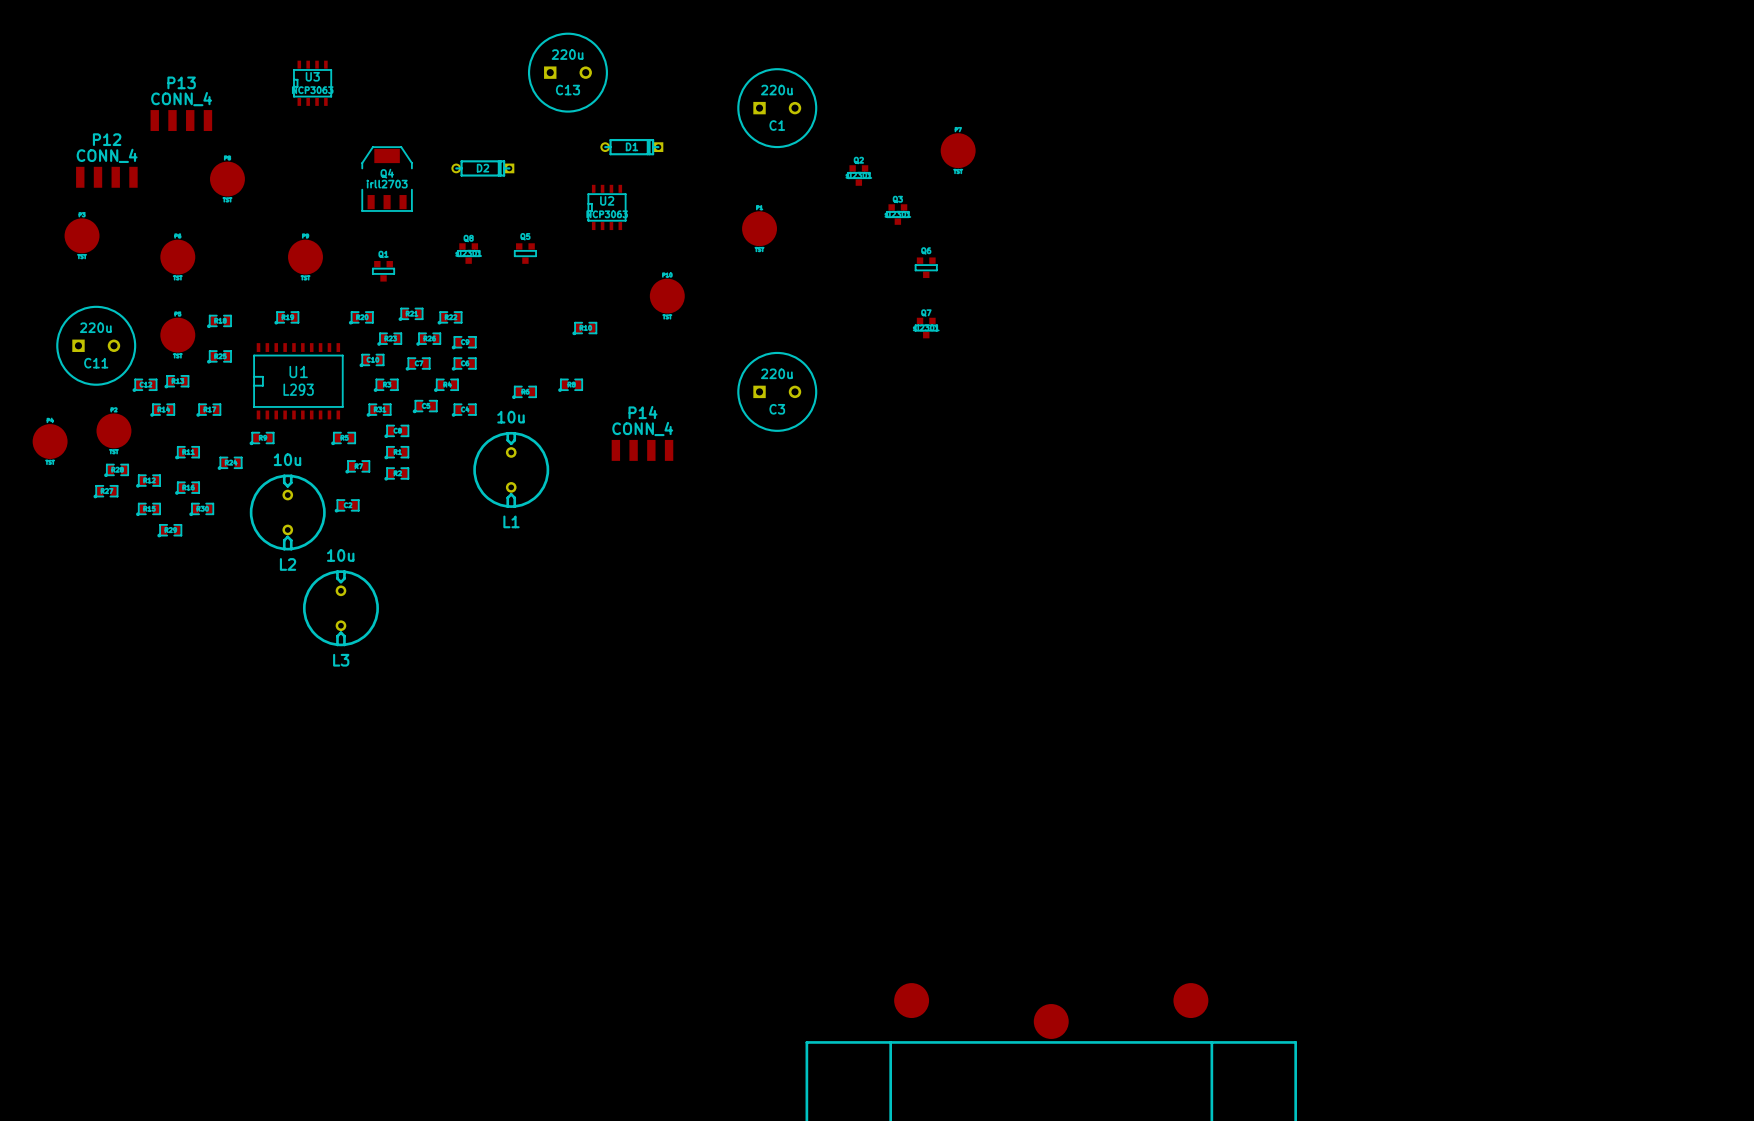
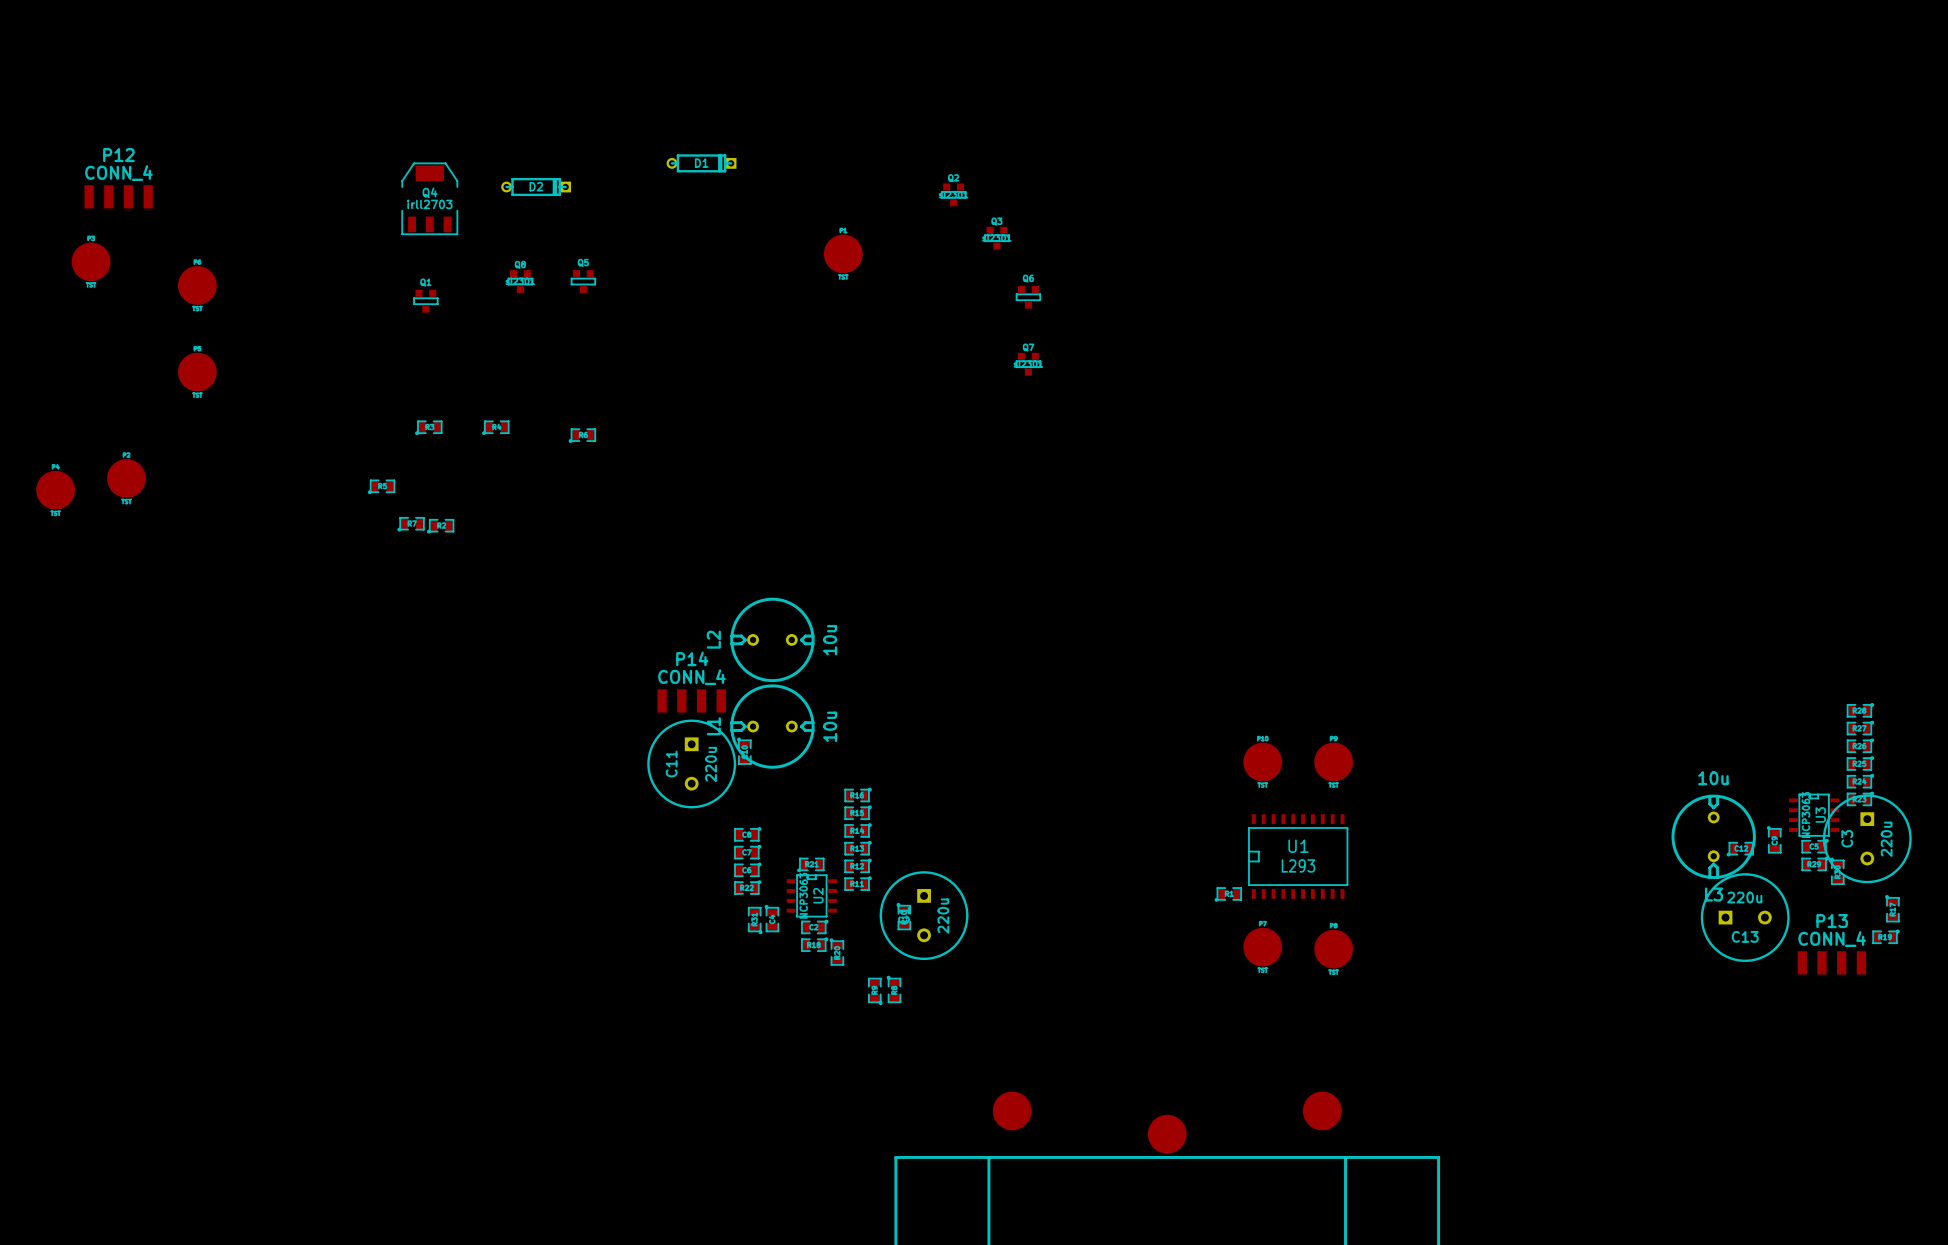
C13 position: (567, 72) -> (1745, 917)
U3 rotation: 0° (312, 83) -> 90° clockwise (1814, 815)
U3 position: (312, 83) -> (1814, 815)
C1 rotation: 0° (777, 108) -> 90° clockwise (924, 915)
C1 position: (777, 108) -> (924, 915)
P13 position: (181, 120) -> (1831, 962)
part position: (958, 150) -> (1262, 947)
part position: (227, 179) -> (1333, 949)
U2 rotation: 0° (607, 207) -> 90° clockwise (811, 895)
U2 position: (607, 207) -> (811, 895)
part position: (305, 257) -> (1333, 762)
part position: (667, 296) -> (1262, 762)
part position: (411, 314) -> (810, 864)
part rotation: 0° (286, 317) -> 180° (1886, 936)
part position: (286, 317) -> (1886, 936)
part rotation: 0° (361, 317) -> 90° clockwise (836, 952)
part position: (361, 317) -> (836, 952)
part rotation: 0° (450, 317) -> 180° (747, 887)
part position: (450, 317) -> (747, 887)
part rotation: 0° (219, 321) -> 180° (814, 944)
part position: (219, 321) -> (814, 944)
part rotation: 0° (584, 328) -> 90° clockwise (903, 916)
part position: (584, 328) -> (903, 916)
part rotation: 0° (389, 339) -> 180° (1860, 798)
part position: (389, 339) -> (1860, 798)
part rotation: 0° (428, 339) -> 180° (1860, 745)
part position: (428, 339) -> (1860, 745)
part rotation: 0° (464, 342) -> 90° clockwise (1774, 839)
part position: (464, 342) -> (1774, 839)
C11 rotation: 0° (96, 345) -> 90° clockwise (691, 763)
C11 position: (96, 345) -> (691, 763)
part rotation: 0° (219, 356) -> 180° (1860, 763)
part position: (219, 356) -> (1860, 763)
part rotation: 0° (372, 360) -> 90° clockwise (744, 751)
part position: (372, 360) -> (744, 751)
part rotation: 0° (418, 363) -> 180° (747, 852)
part position: (418, 363) -> (747, 852)
part rotation: 0° (464, 363) -> 180° (747, 869)
part position: (464, 363) -> (747, 869)
part rotation: 0° (176, 381) -> 180° (858, 848)
part position: (176, 381) -> (858, 848)
U1 position: (298, 381) -> (1298, 856)
part position: (144, 385) -> (1740, 849)
part rotation: 0° (570, 385) -> 90° clockwise (894, 989)
part position: (570, 385) -> (894, 989)
C3 rotation: 0° (777, 391) -> 90° clockwise (1867, 838)
C3 position: (777, 391) -> (1867, 838)
part rotation: 0° (425, 406) -> 180° (1815, 846)
part position: (425, 406) -> (1815, 846)
part rotation: 0° (162, 410) -> 180° (858, 830)
part position: (162, 410) -> (858, 830)
part rotation: 0° (208, 410) -> 90° clockwise (1892, 908)
part position: (208, 410) -> (1892, 908)
part rotation: 0° (379, 410) -> 90° counterclockwise (755, 920)
part position: (379, 410) -> (755, 920)
part rotation: 0° (464, 410) -> 90° clockwise (771, 918)
part position: (464, 410) -> (771, 918)
part rotation: 0° (396, 431) -> 180° (747, 834)
part position: (396, 431) -> (747, 834)
part rotation: 0° (262, 438) -> 90° counterclockwise (875, 991)
part position: (262, 438) -> (875, 991)
P14 position: (642, 450) -> (691, 700)
part rotation: 0° (187, 452) -> 180° (858, 883)
part position: (187, 452) -> (858, 883)
part position: (396, 452) -> (1228, 894)
part rotation: 0° (230, 463) -> 180° (1860, 781)
part position: (230, 463) -> (1860, 781)
part position: (357, 466) -> (411, 524)
L1 rotation: 0° (511, 469) -> 90° clockwise (772, 726)
L1 position: (511, 469) -> (772, 726)
part rotation: 0° (116, 470) -> 180° (1860, 710)
part position: (116, 470) -> (1860, 710)
part rotation: 0° (148, 481) -> 180° (858, 865)
part position: (148, 481) -> (858, 865)
part rotation: 0° (187, 488) -> 180° (858, 794)
part position: (187, 488) -> (858, 794)
part rotation: 0° (105, 491) -> 180° (1860, 728)
part position: (105, 491) -> (1860, 728)
part rotation: 0° (347, 505) -> 180° (814, 926)
part position: (347, 505) -> (814, 926)
part rotation: 0° (148, 509) -> 180° (858, 812)
part position: (148, 509) -> (858, 812)
part rotation: 0° (201, 509) -> 90° clockwise (1837, 871)
part position: (201, 509) -> (1837, 871)
L2 rotation: 0° (287, 512) -> 90° clockwise (772, 639)
L2 position: (287, 512) -> (772, 639)
part rotation: 0° (169, 530) -> 180° (1815, 863)
part position: (169, 530) -> (1815, 863)
L3 position: (340, 608) -> (1713, 836)

